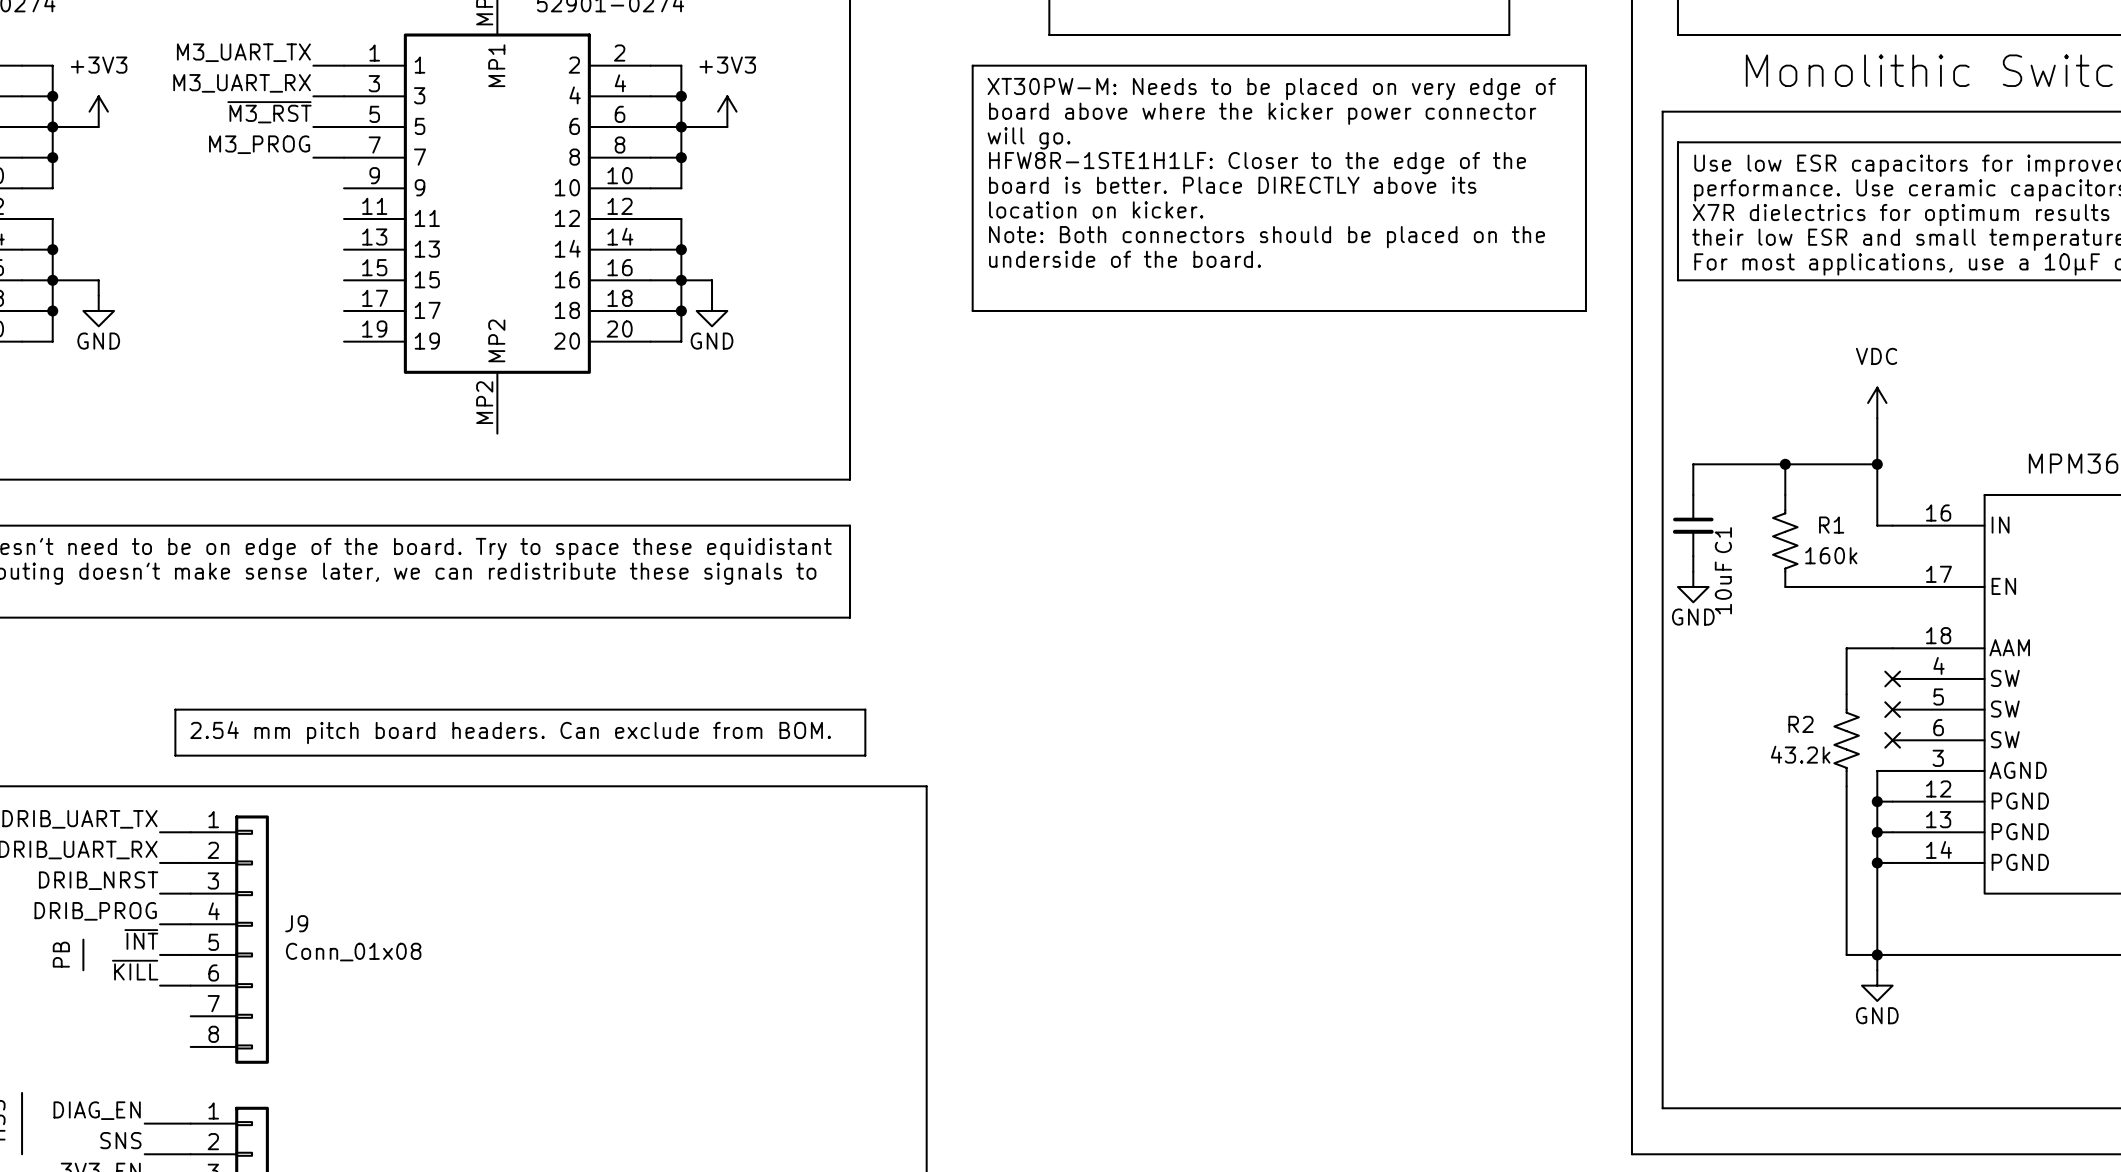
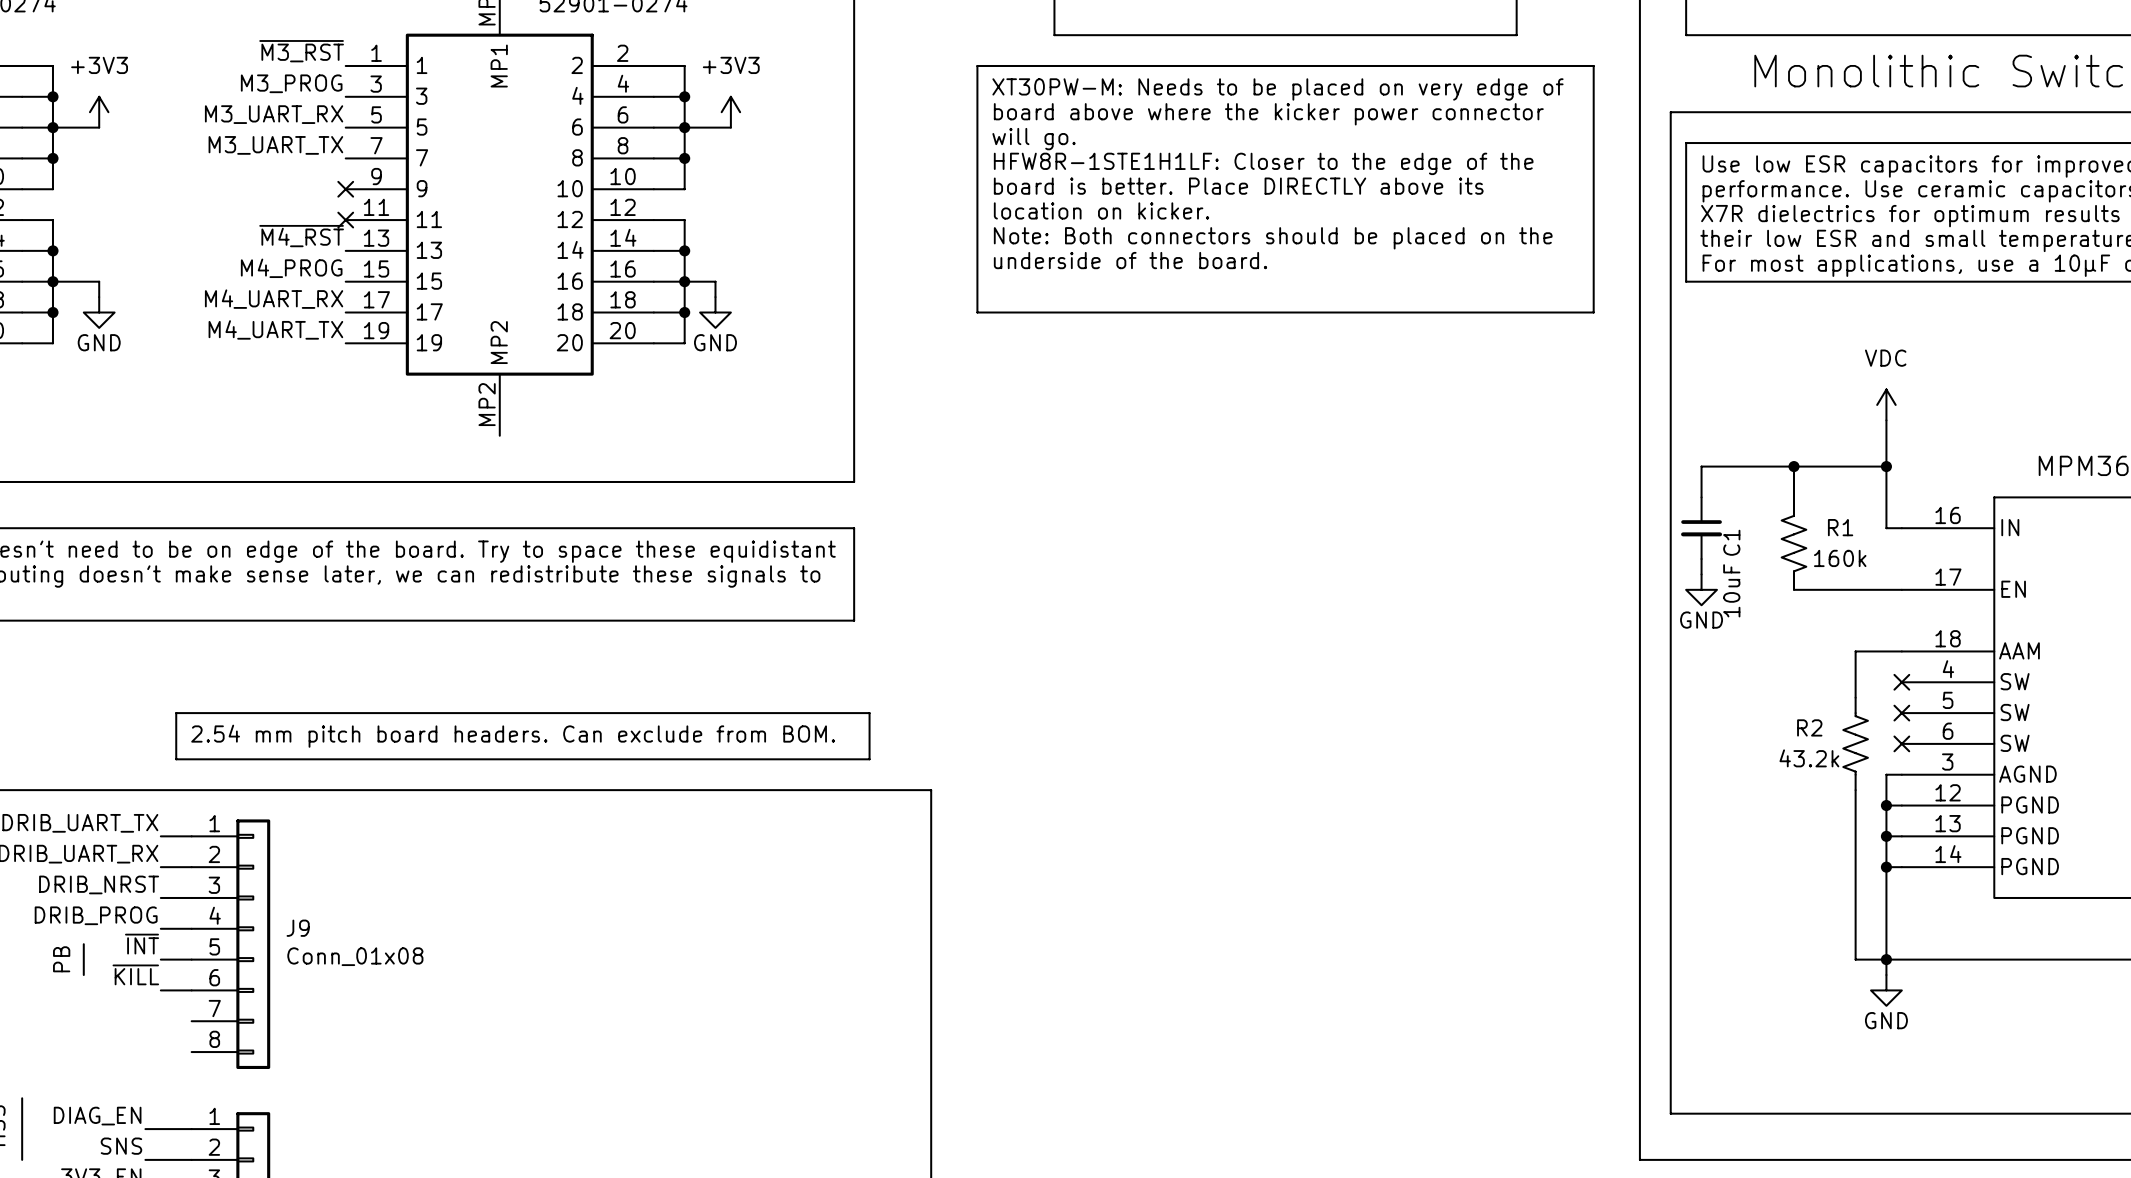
label position: M3_UART_TX (243, 52) -> M3_UART_TX (275, 145)
wire: (313, 65) (344, 65) -> none
label position: M3_UART_RX (242, 83) -> M3_UART_RX (274, 114)
wire: (313, 96) (344, 96) -> none
label position: ~{M3_RST} (269, 112) -> ~{M3_RST} (301, 51)
wire: (313, 127) (344, 127) -> none
label position: M3_PROG (259, 144) -> M3_PROG (291, 83)
wire: (313, 157) (344, 157) -> none
no-connect mark: none -> (345, 189)
no-connect mark: none -> (345, 220)
label: none -> ~{M4_RST} (301, 236)
label: none -> M4_PROG (291, 268)
label: none -> M4_UART_RX (274, 299)
label: none -> M4_UART_TX (275, 329)

